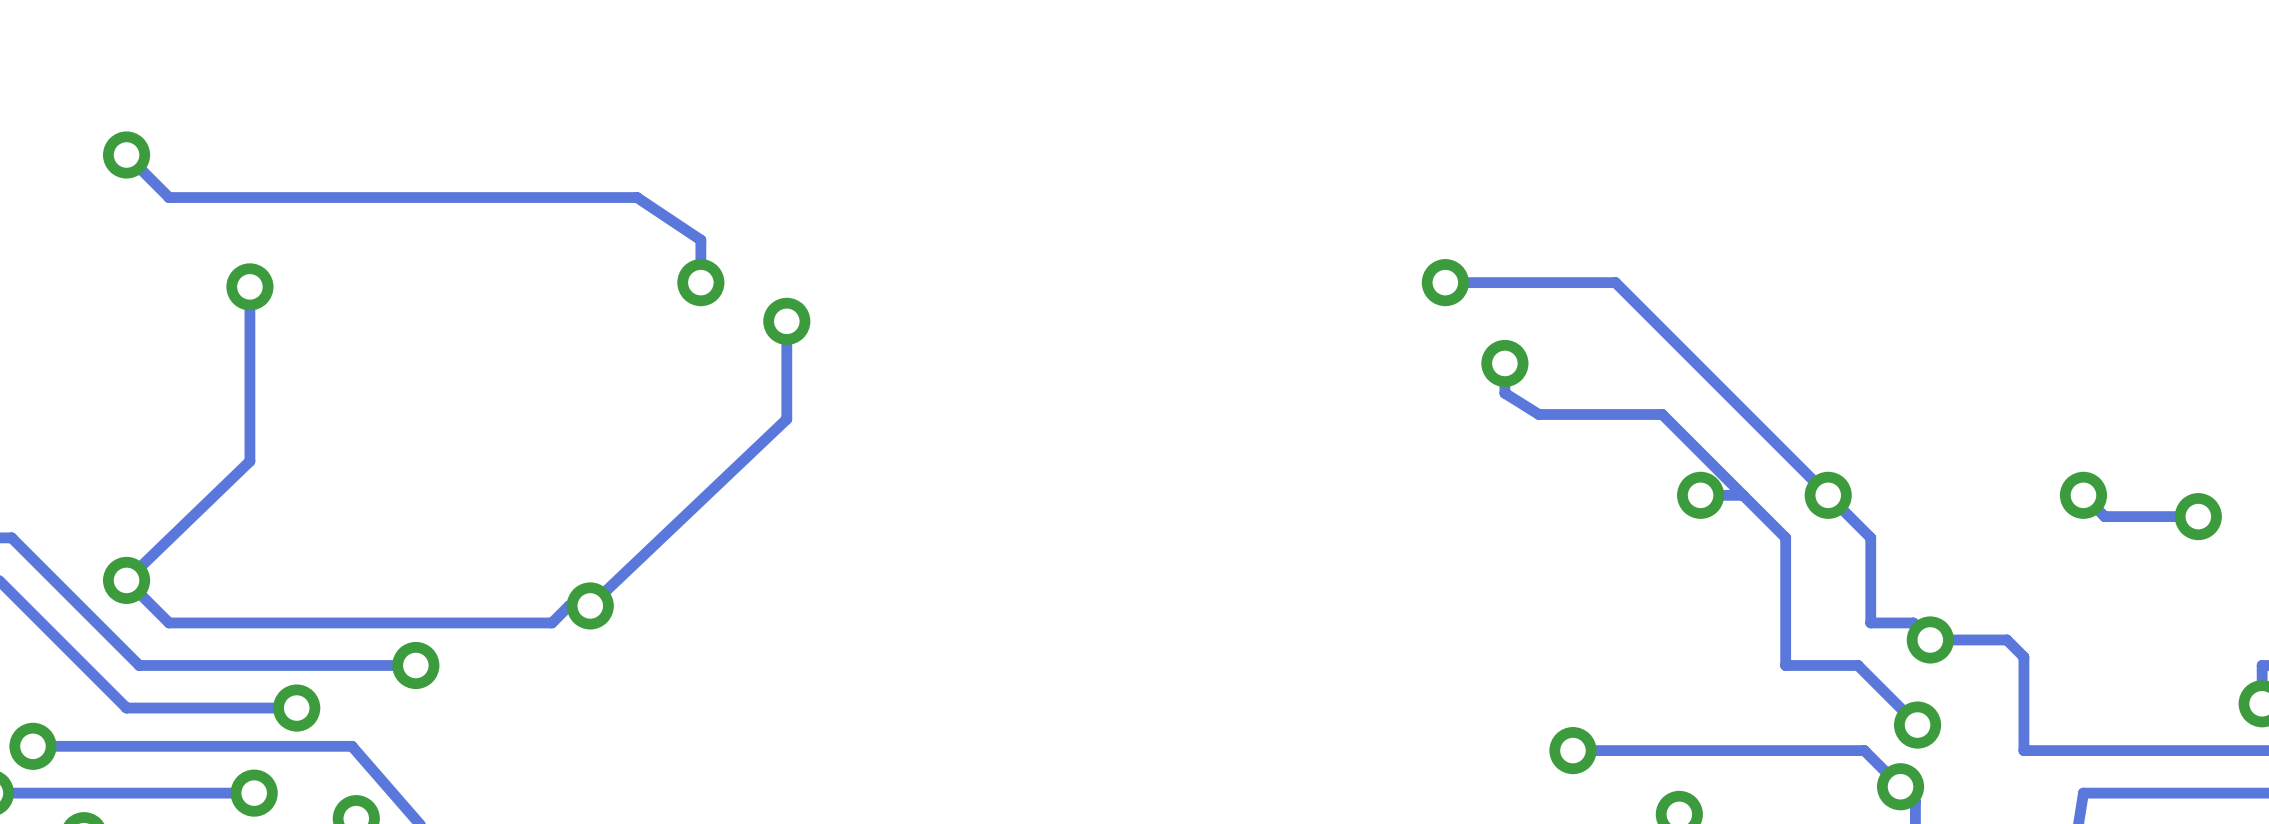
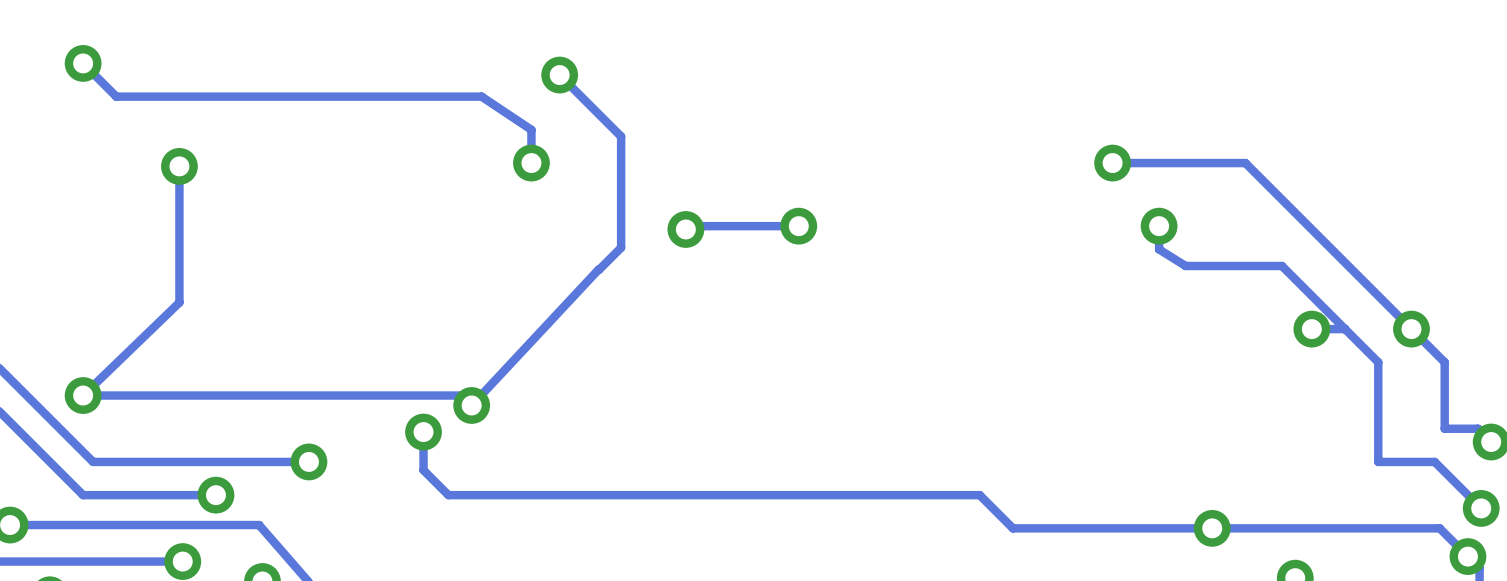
via: none -> (559, 75)
track: (786, 321) (786, 419) (590, 605) (568, 605) (551, 622) (169, 622) (126, 580) -> (559, 75) (621, 136) (621, 247) (471, 405) (471, 395) (83, 395)
via: (786, 321) -> none
track: none -> (798, 226) (684, 226) (685, 229)
via: none -> (798, 226)
via: none -> (685, 229)
via: none -> (471, 405)
via: (590, 605) -> none
track: none -> (423, 432) (423, 470) (448, 495) (979, 495) (1012, 528) (1212, 528)
via: none -> (423, 432)

